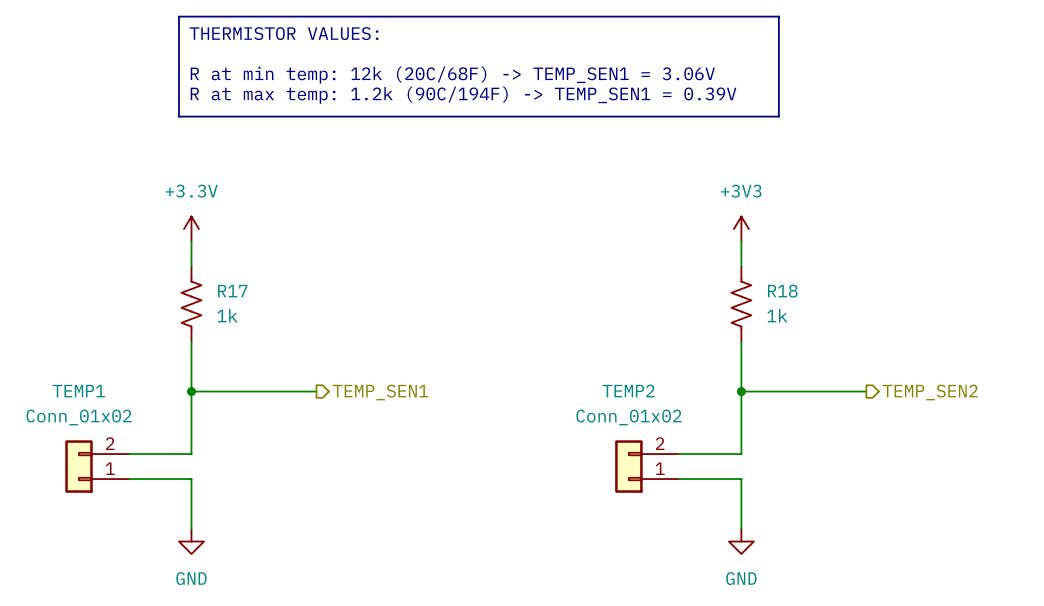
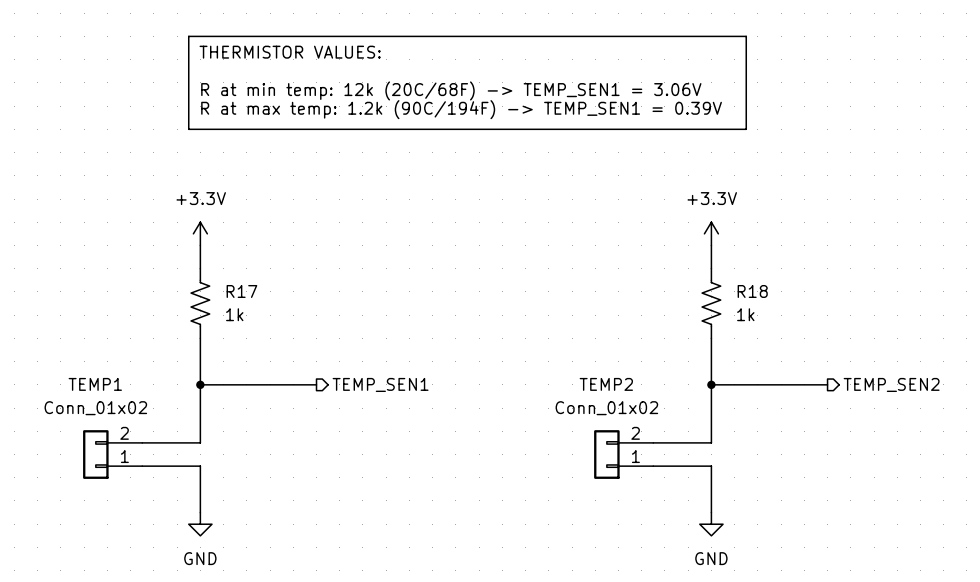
power symbol: +3V3 (741, 229) -> +3.3V (711, 233)

